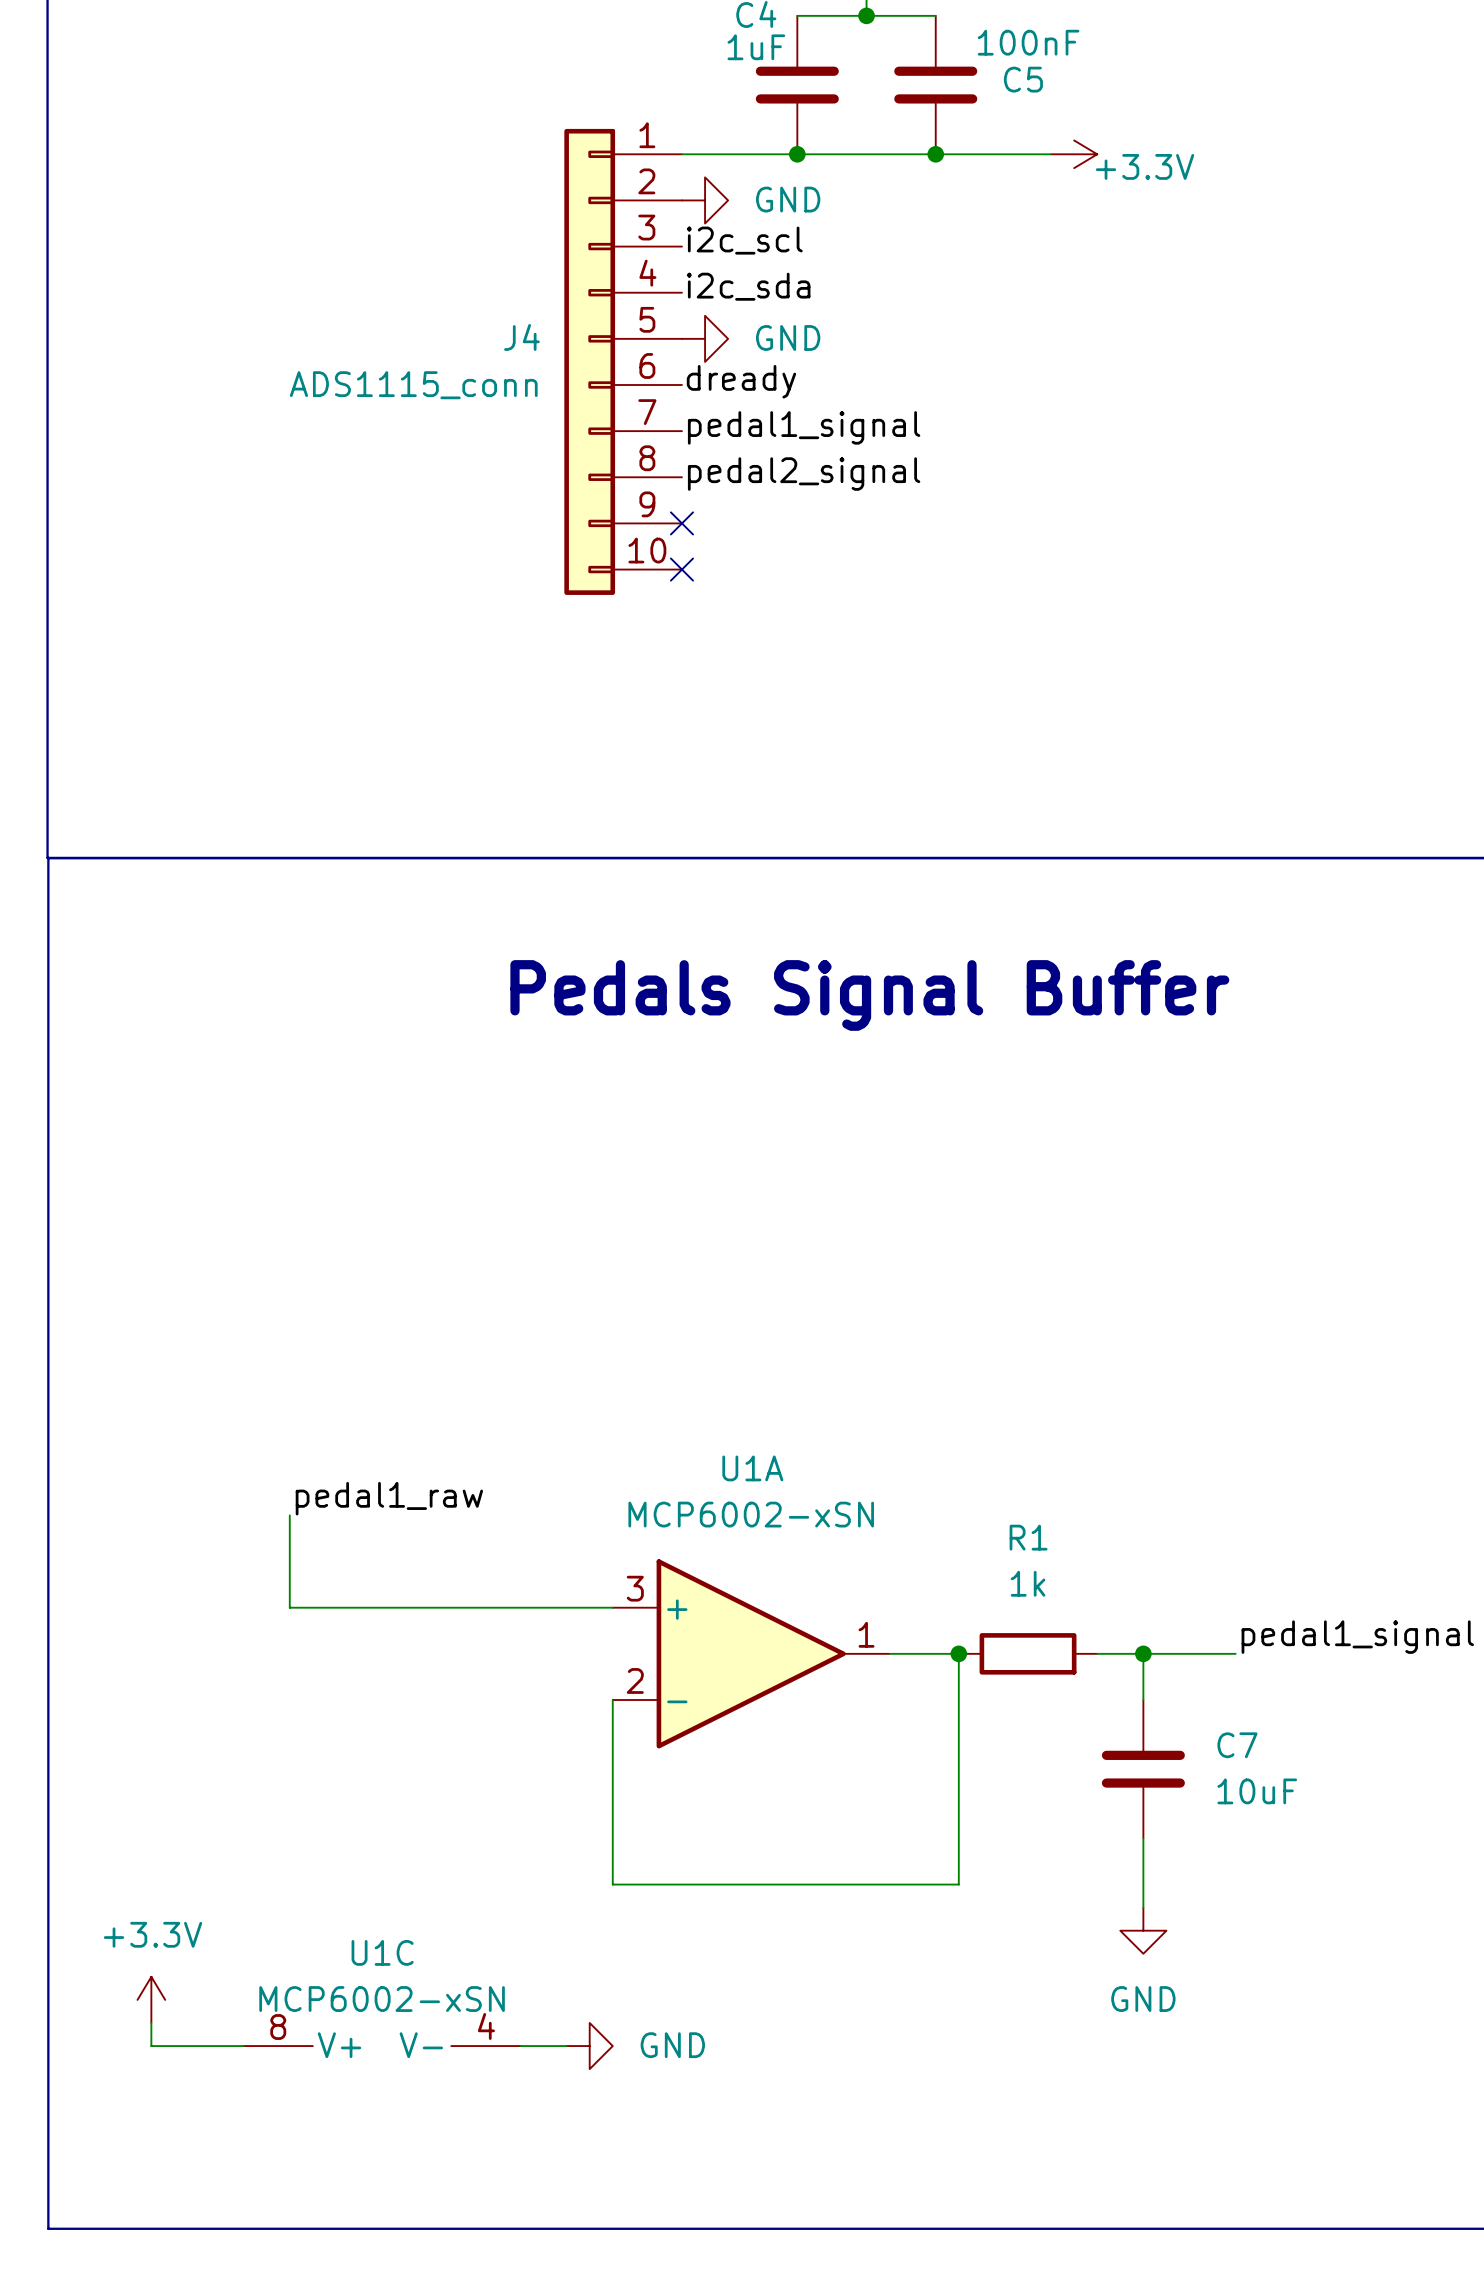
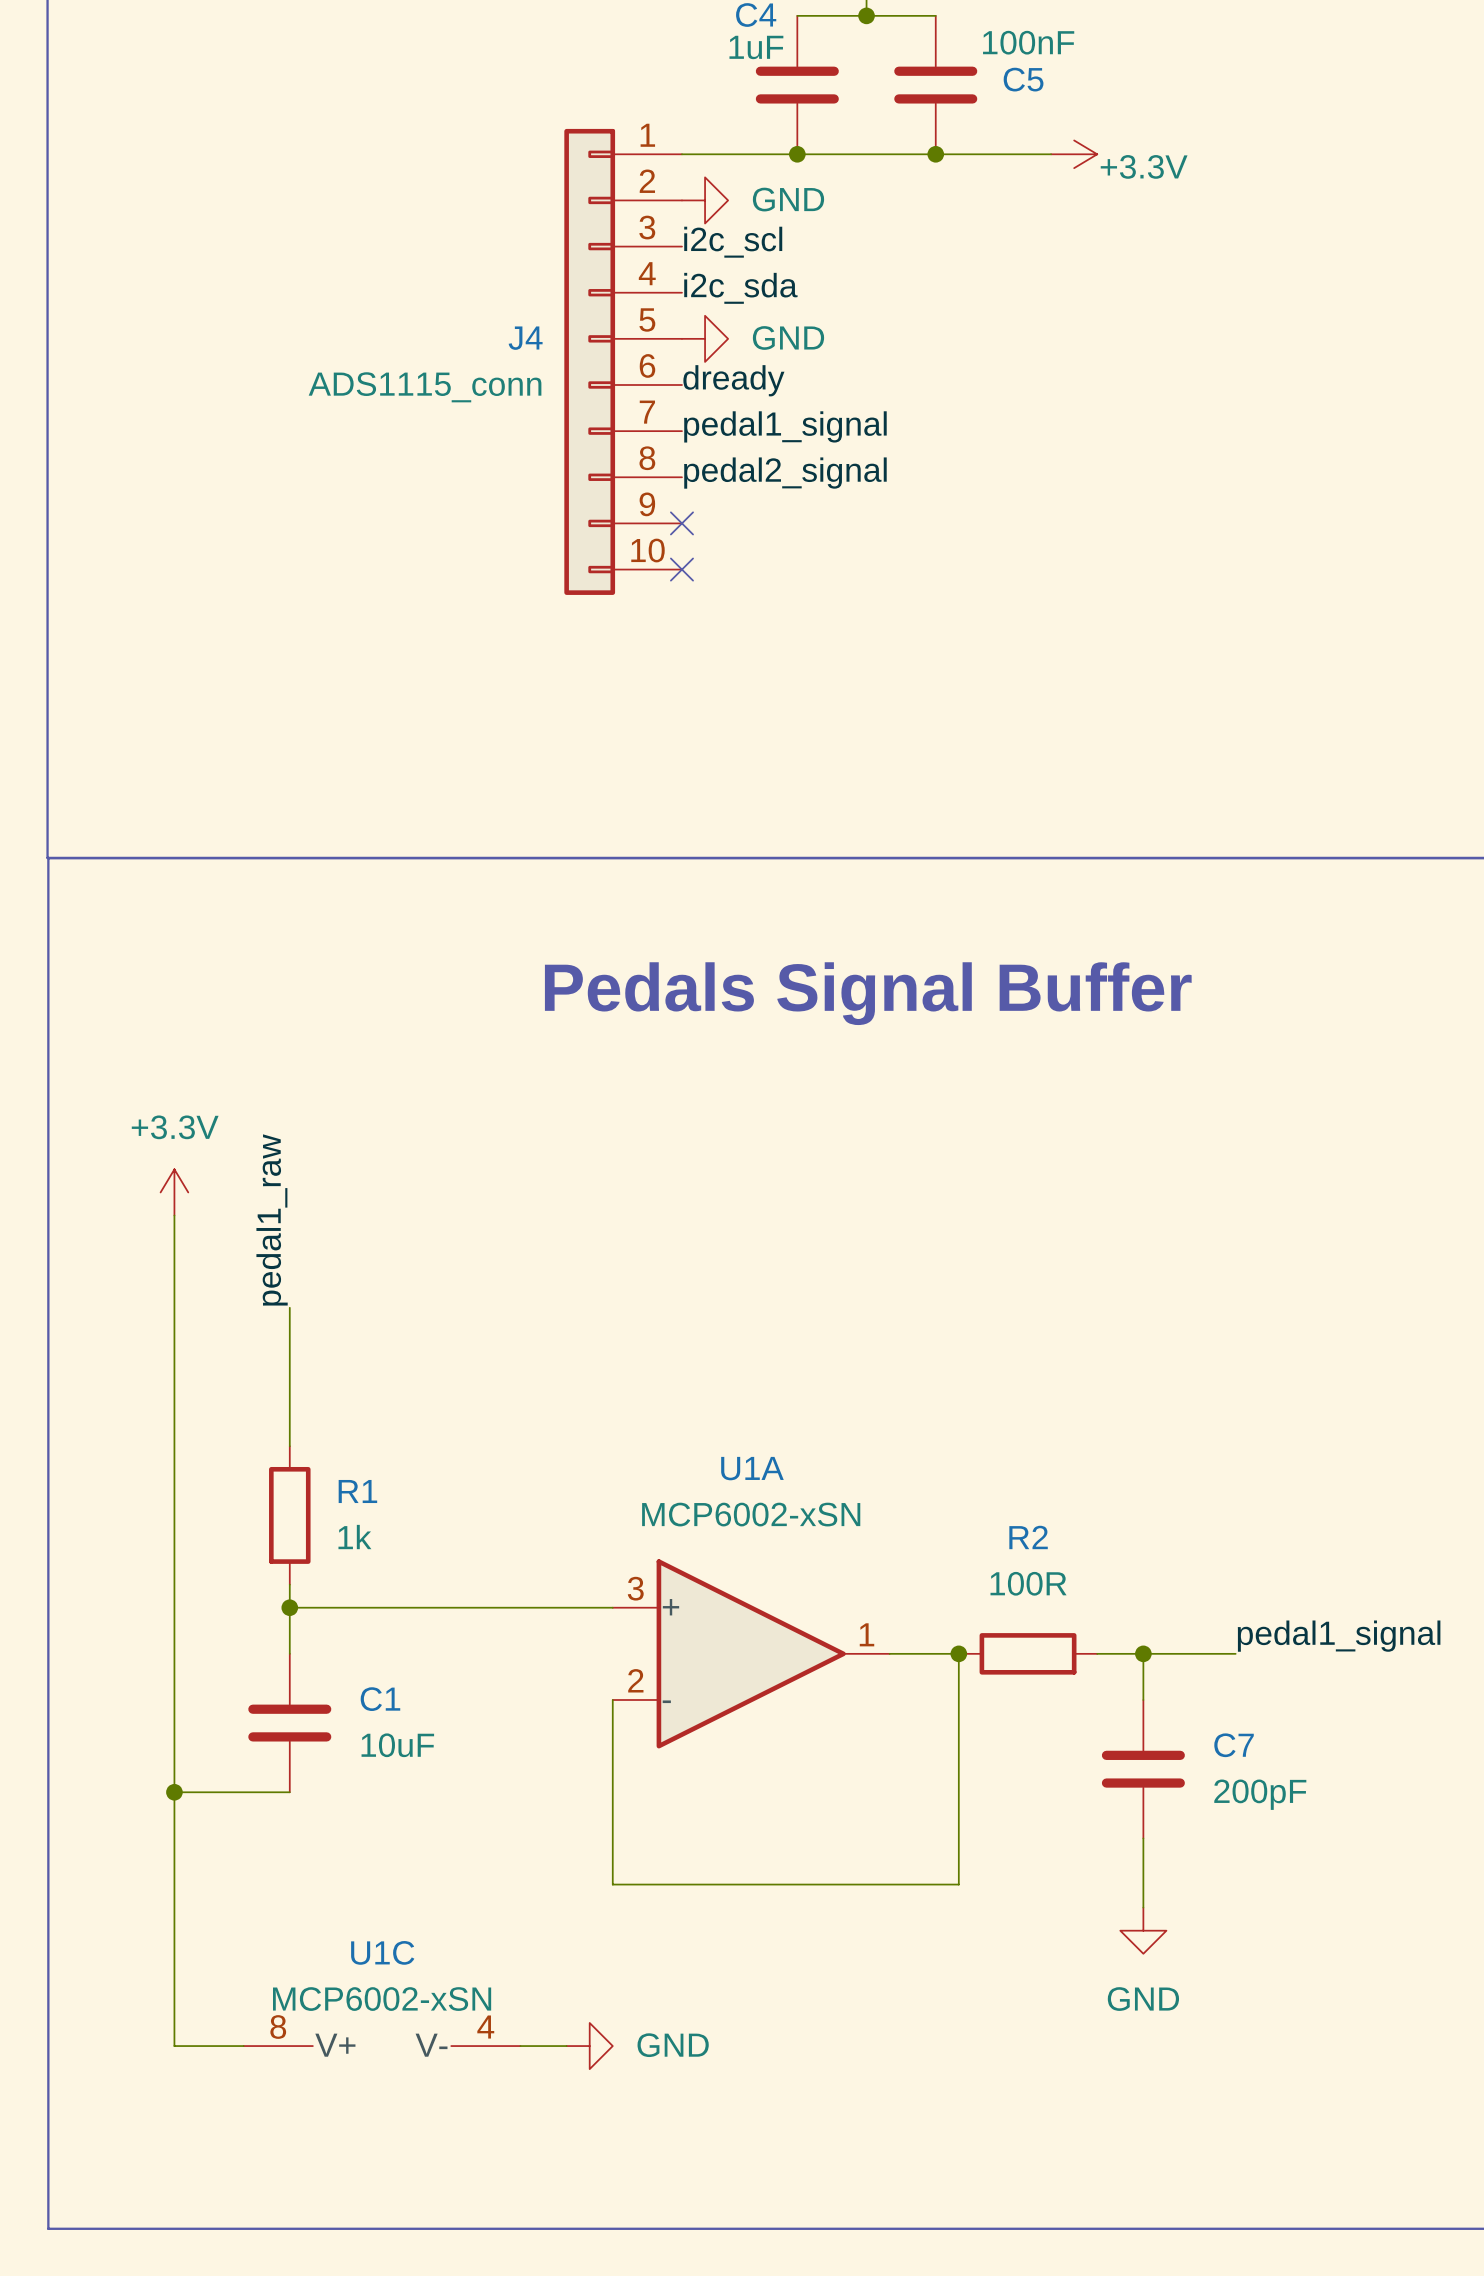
power symbol: none -> +3.3V (174, 1192)
wire: none -> (289, 1307) (289, 1446)
label rotation: 0° (389, 1498) -> 90° counterclockwise (272, 1219)
label position: pedal1_raw (389, 1498) -> pedal1_raw (272, 1219)
wire: (289, 1515) (289, 1584) -> none
R1: none -> 1k (289, 1515)
R1 name: R1 (1028, 1537) -> R2 (1028, 1537)
R1 value: 1k (1028, 1583) -> 100R (1028, 1583)
wire: none -> (289, 1607) (289, 1653)
junction: none -> (289, 1607)
C1: none -> 10uF (289, 1723)
C7 value: 10uF (1257, 1791) -> 200pF (1260, 1794)
wire: none -> (174, 1792) (289, 1792)
junction: none -> (174, 1792)
power symbol: +3.3V (151, 1999) -> none
wire: (151, 2022) (151, 2046) (174, 2046) -> (174, 1215) (174, 2046)

